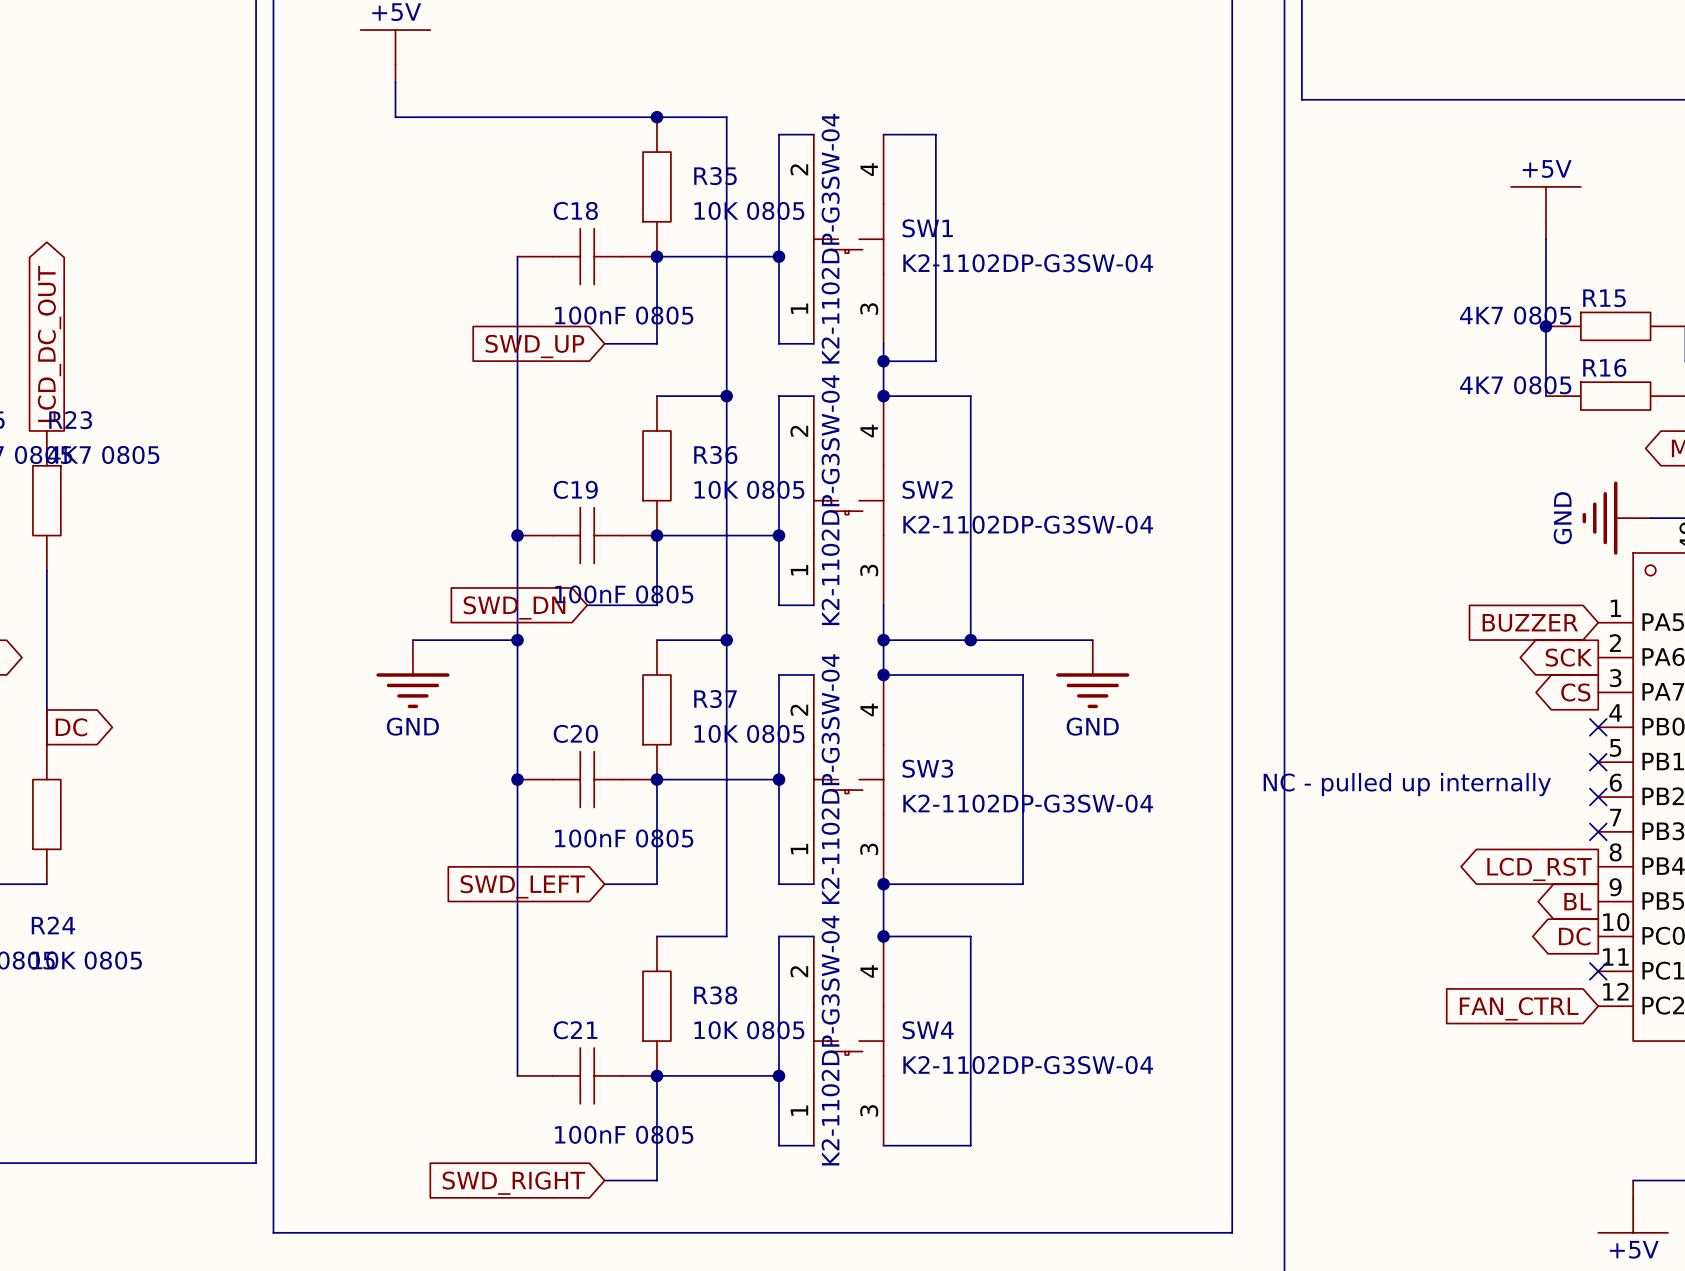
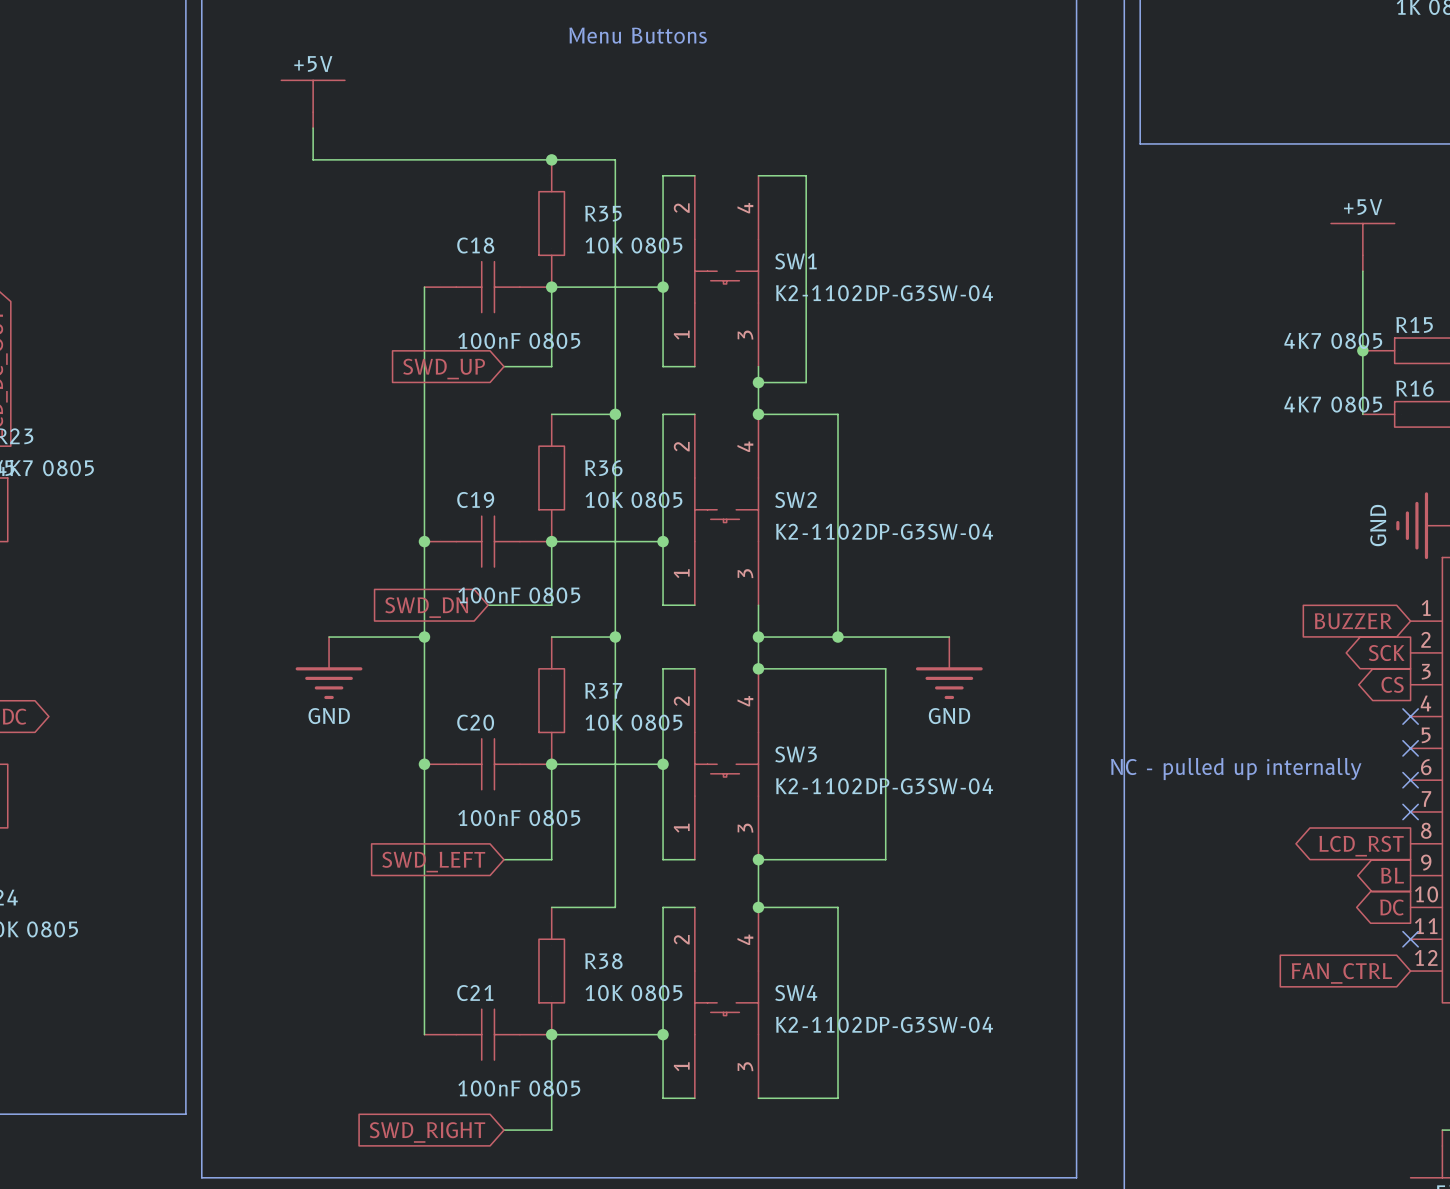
SW1 text: K2-1102DP-G3SW-04 (830, 238) -> none
SW2 text: K2-1102DP-G3SW-04 (830, 500) -> none
SW3 text: K2-1102DP-G3SW-04 (830, 779) -> none
SW4 text: K2-1102DP-G3SW-04 (830, 1040) -> none

